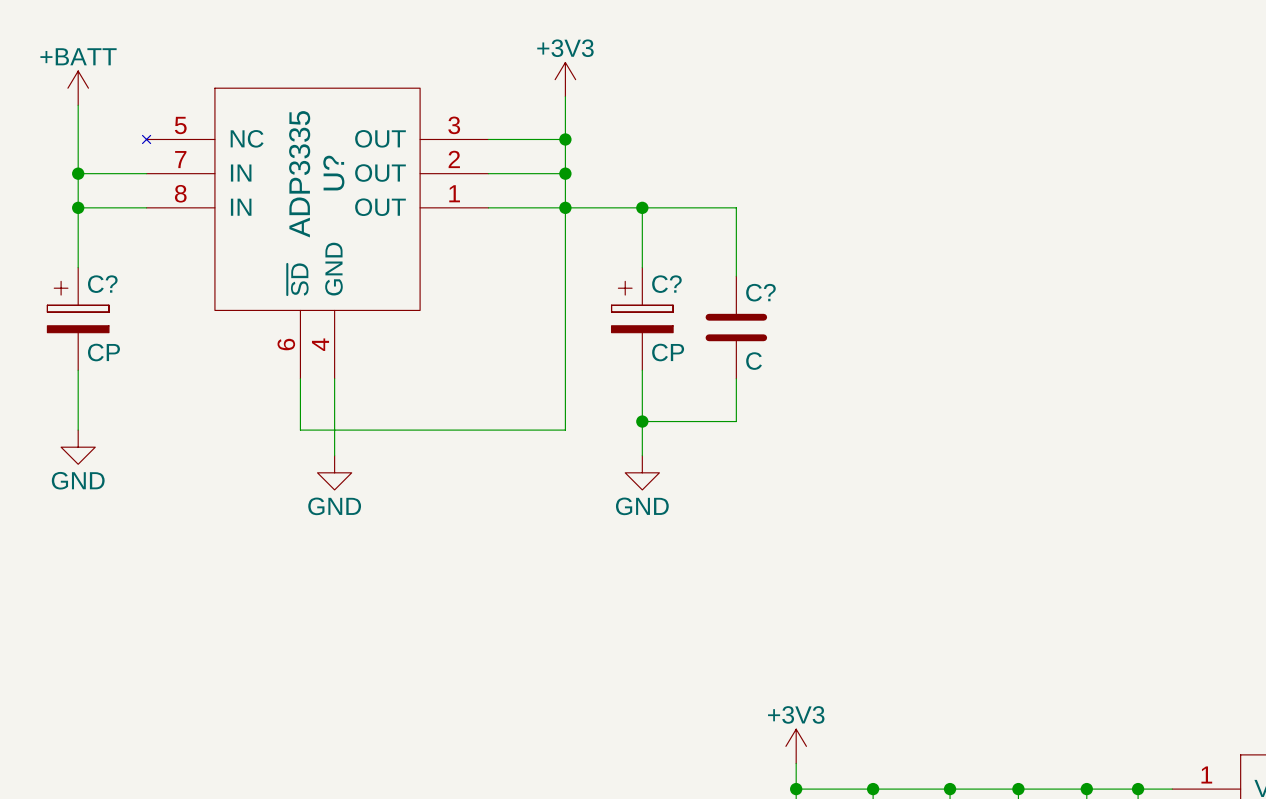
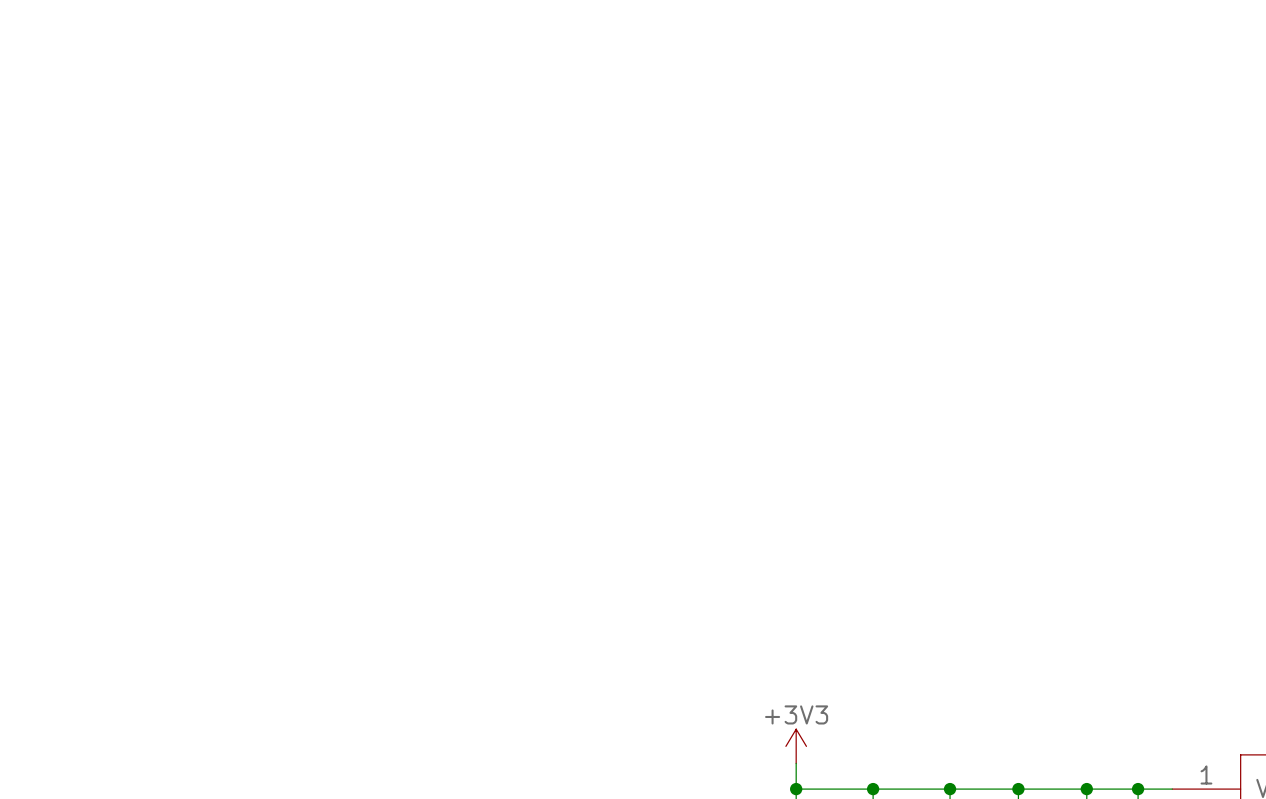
power symbol: +3V3 (565, 79) -> none
power symbol: +BATT (78, 88) -> none
wire: (565, 96) (565, 430) (300, 430) (300, 378) -> none
wire: (78, 105) (78, 267) -> none
wire: (488, 139) (565, 139) -> none
junction: (565, 139) -> none
wire: (78, 173) (146, 173) -> none
junction: (78, 173) -> none
wire: (488, 173) (565, 173) -> none
junction: (565, 173) -> none
wire: (78, 207) (146, 207) -> none
junction: (78, 207) -> none
wire: (488, 207) (736, 207) (736, 276) -> none
junction: (565, 207) -> none
wire: (642, 207) (642, 267) -> none
junction: (642, 207) -> none
U?: ADP3335 (315, 233) -> none
C?: CP (78, 318) -> none
C?: CP (642, 318) -> none
C?: C (736, 327) -> none
wire: (78, 370) (78, 430) -> none
wire: (642, 370) (642, 455) -> none
wire: (334, 378) (334, 455) -> none
wire: (736, 378) (736, 421) (642, 421) -> none
junction: (642, 421) -> none
power symbol: GND (78, 447) -> none
power symbol: GND (334, 472) -> none
power symbol: GND (642, 472) -> none

